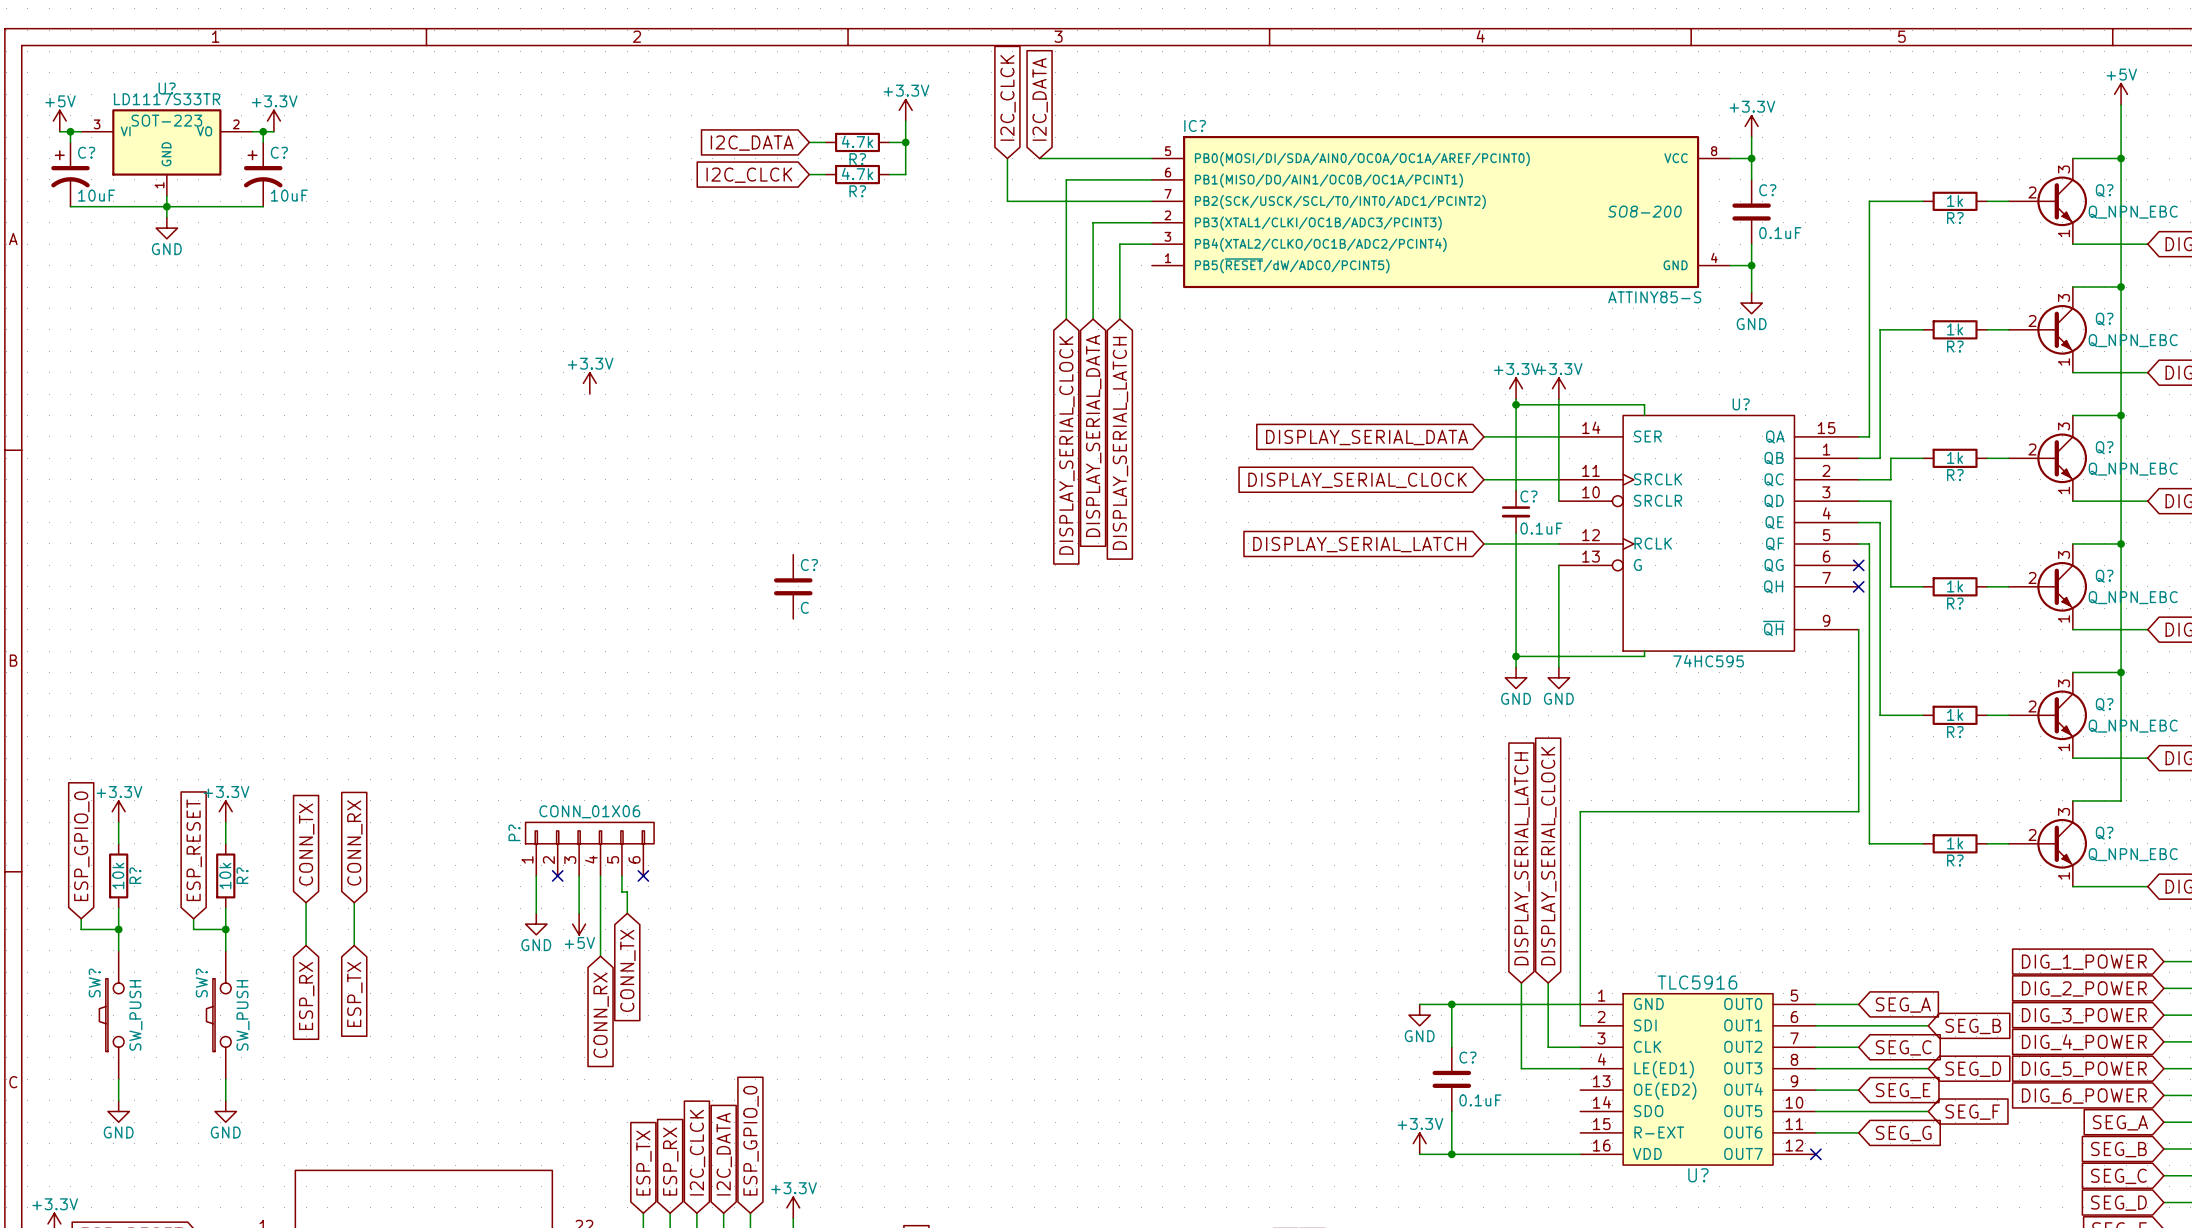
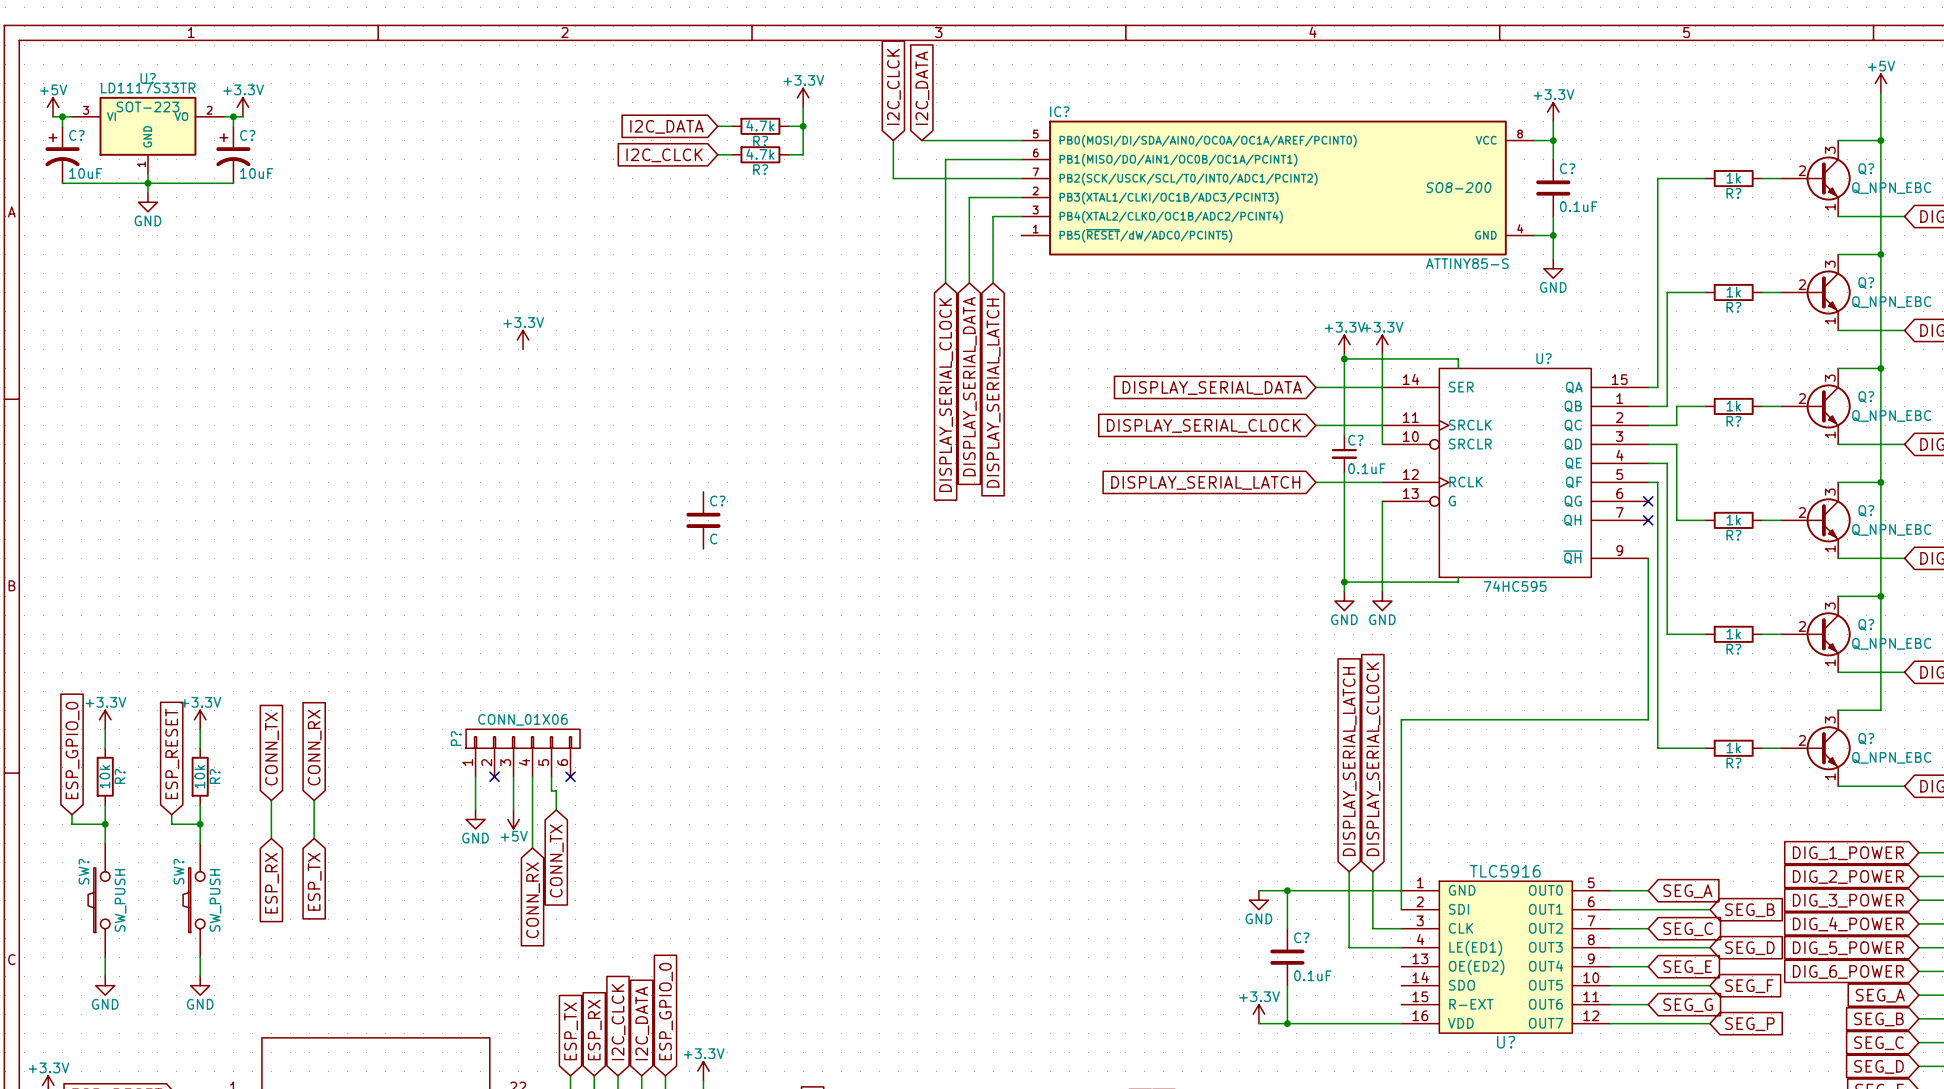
wire: none -> (1610, 1023) (1709, 1023)
no-connect mark: (1815, 1154) -> none
global label: none -> SEG_P (1749, 1024)

